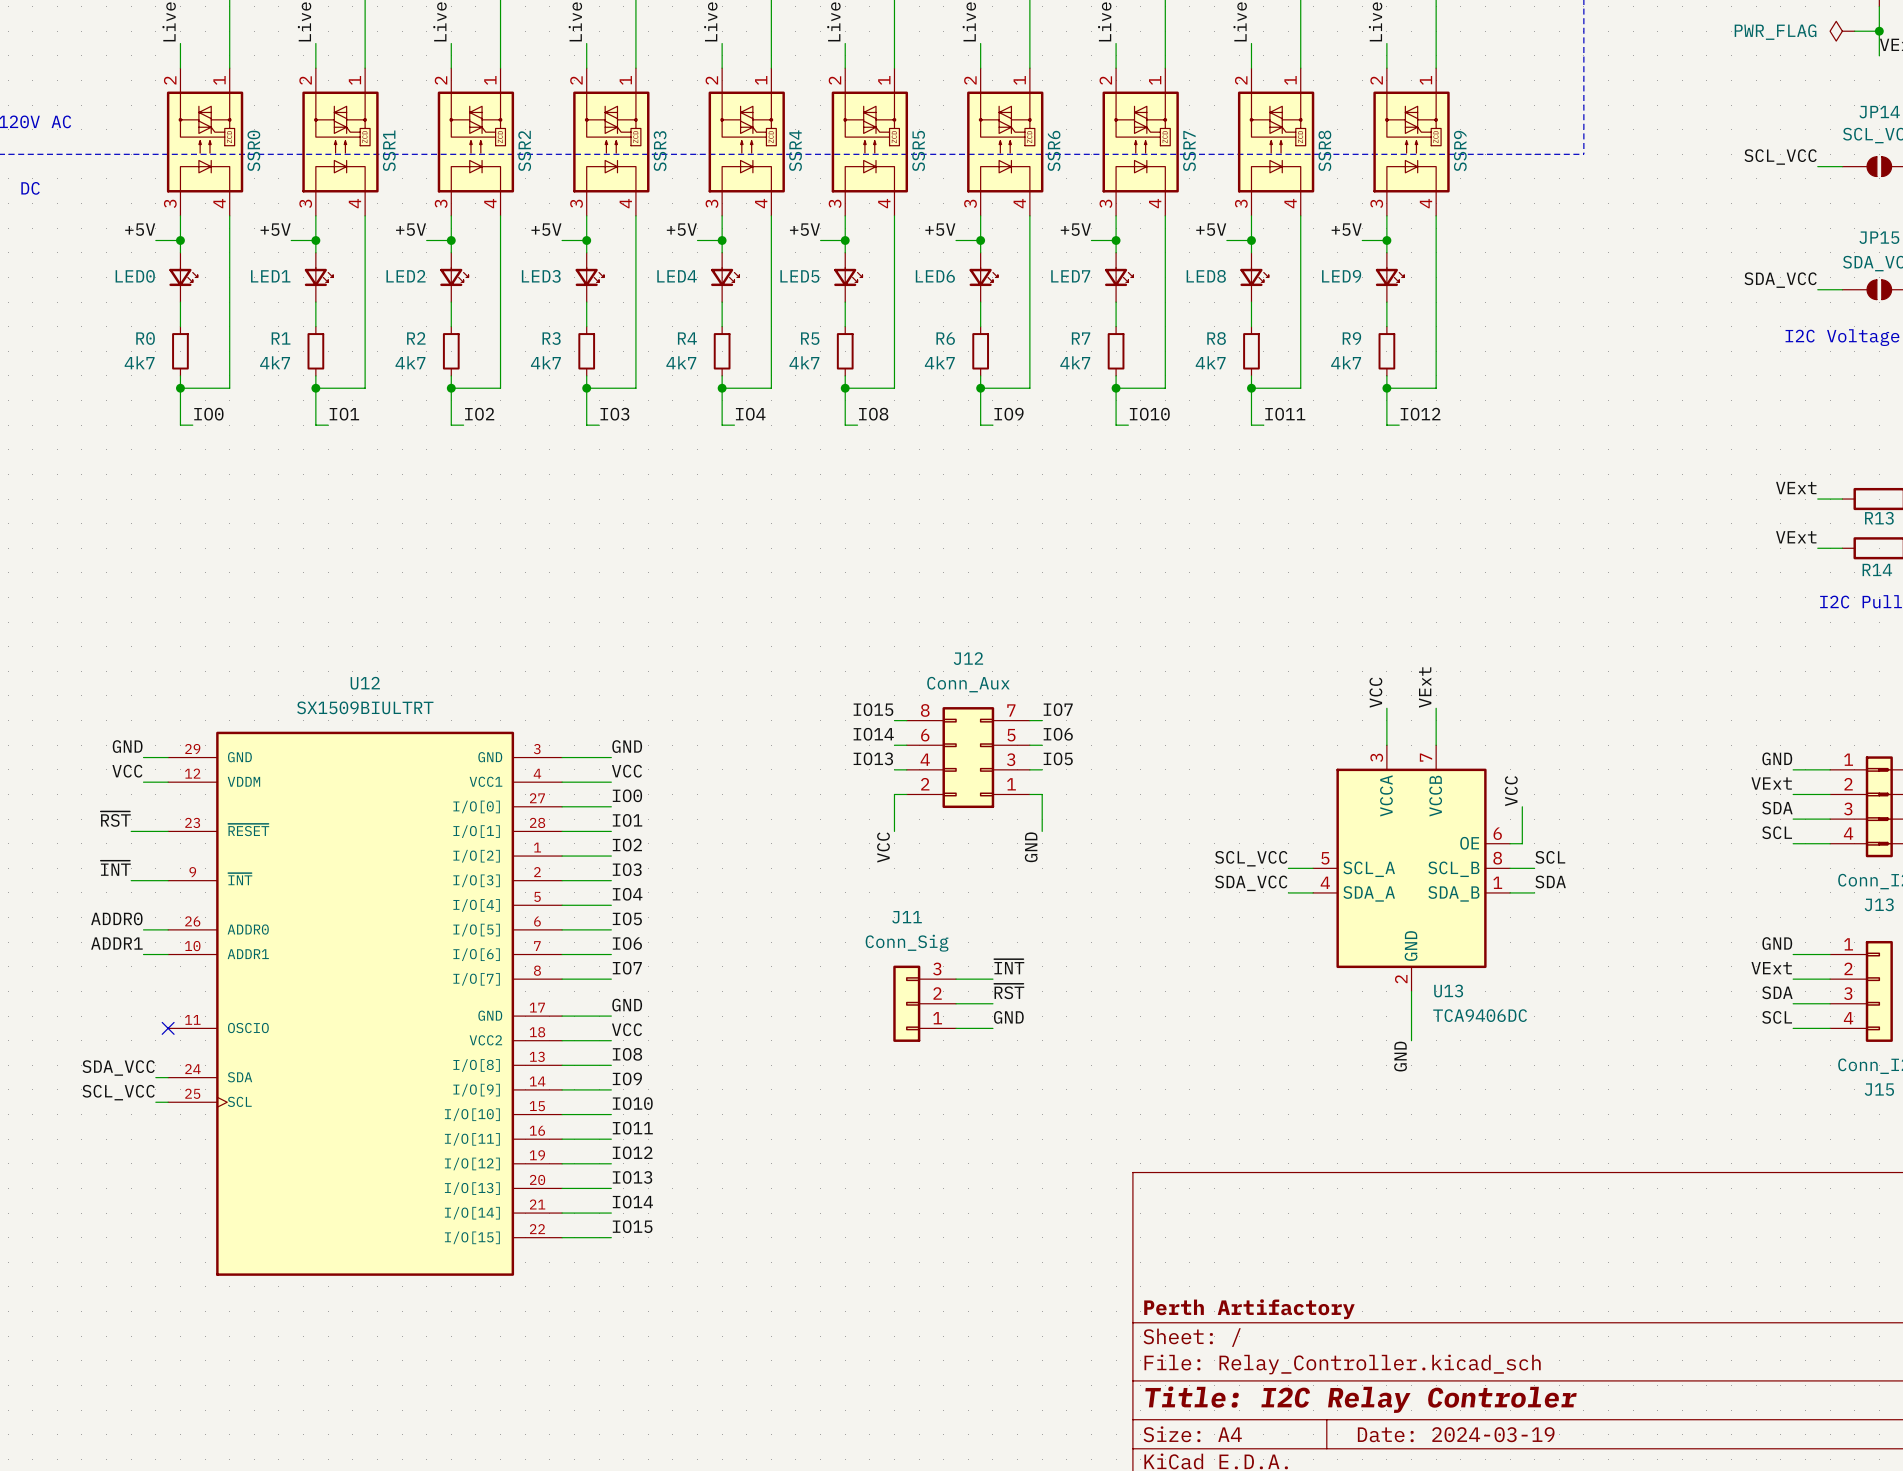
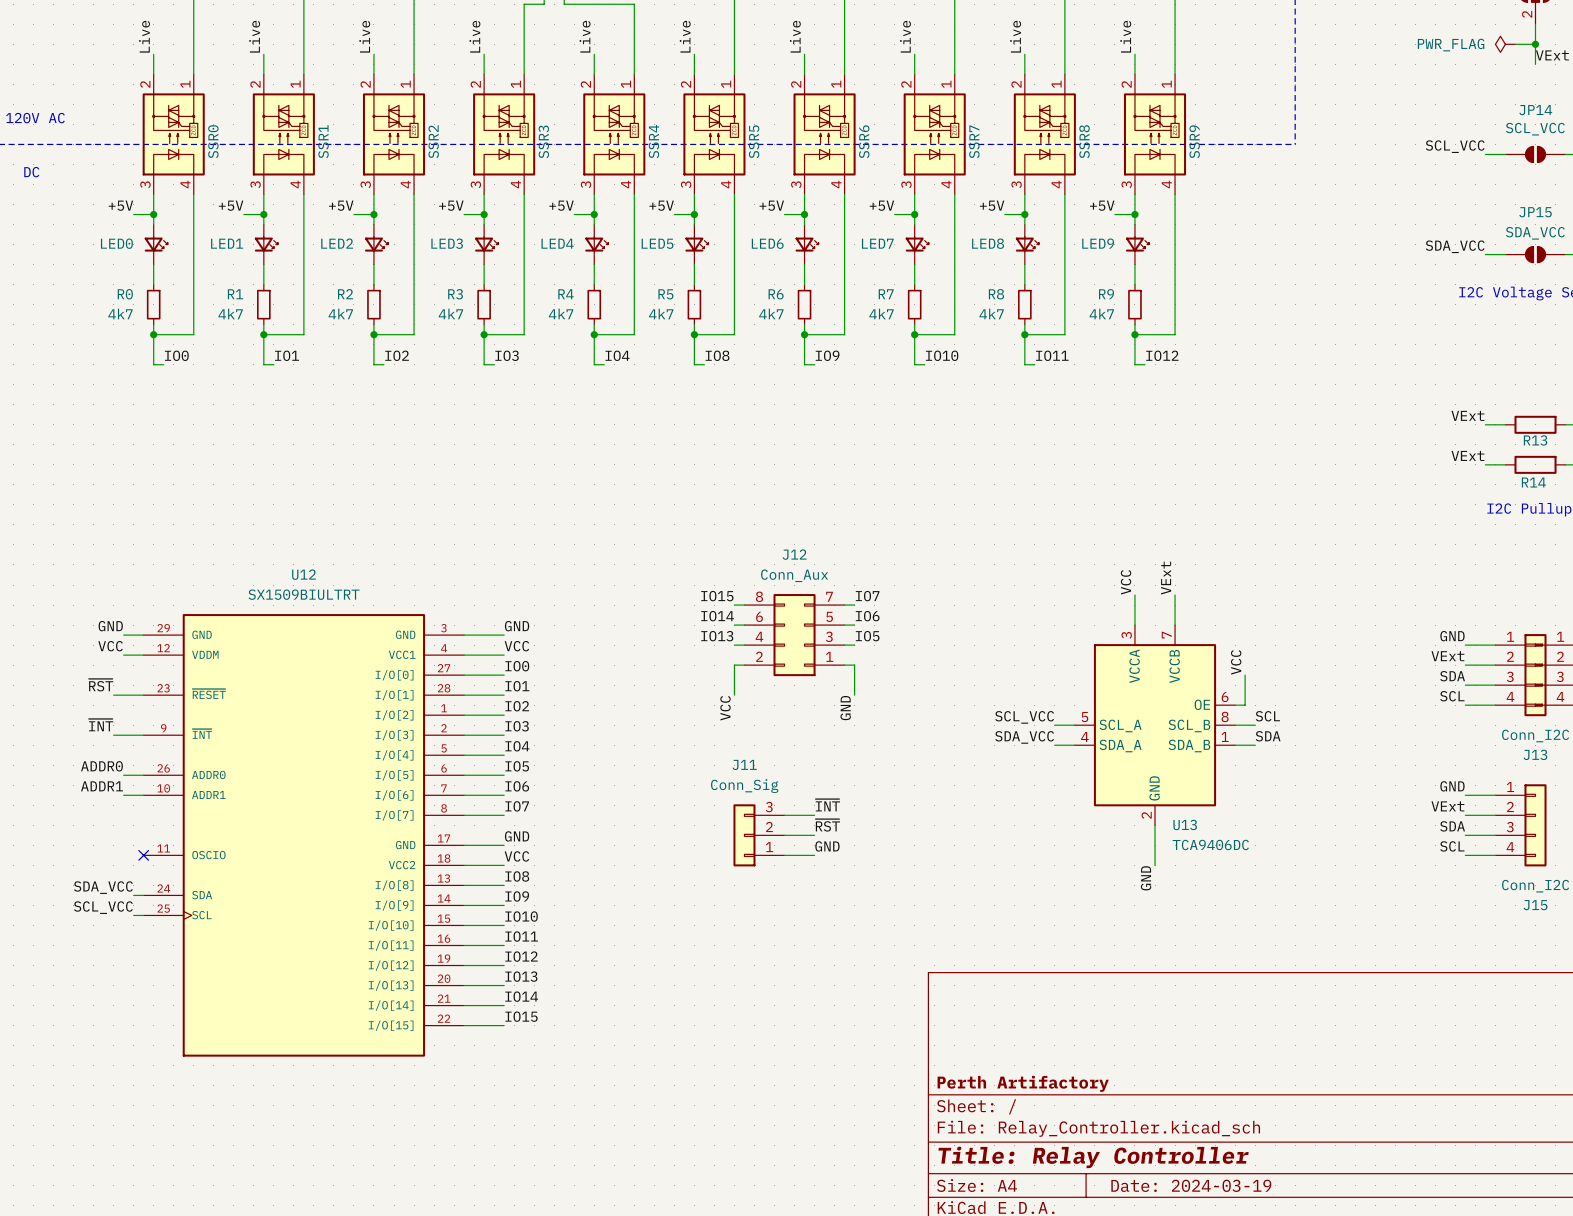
title block: Title: I2C Relay Controler (1360, 1399) -> Title: Relay Controller (1093, 1157)

